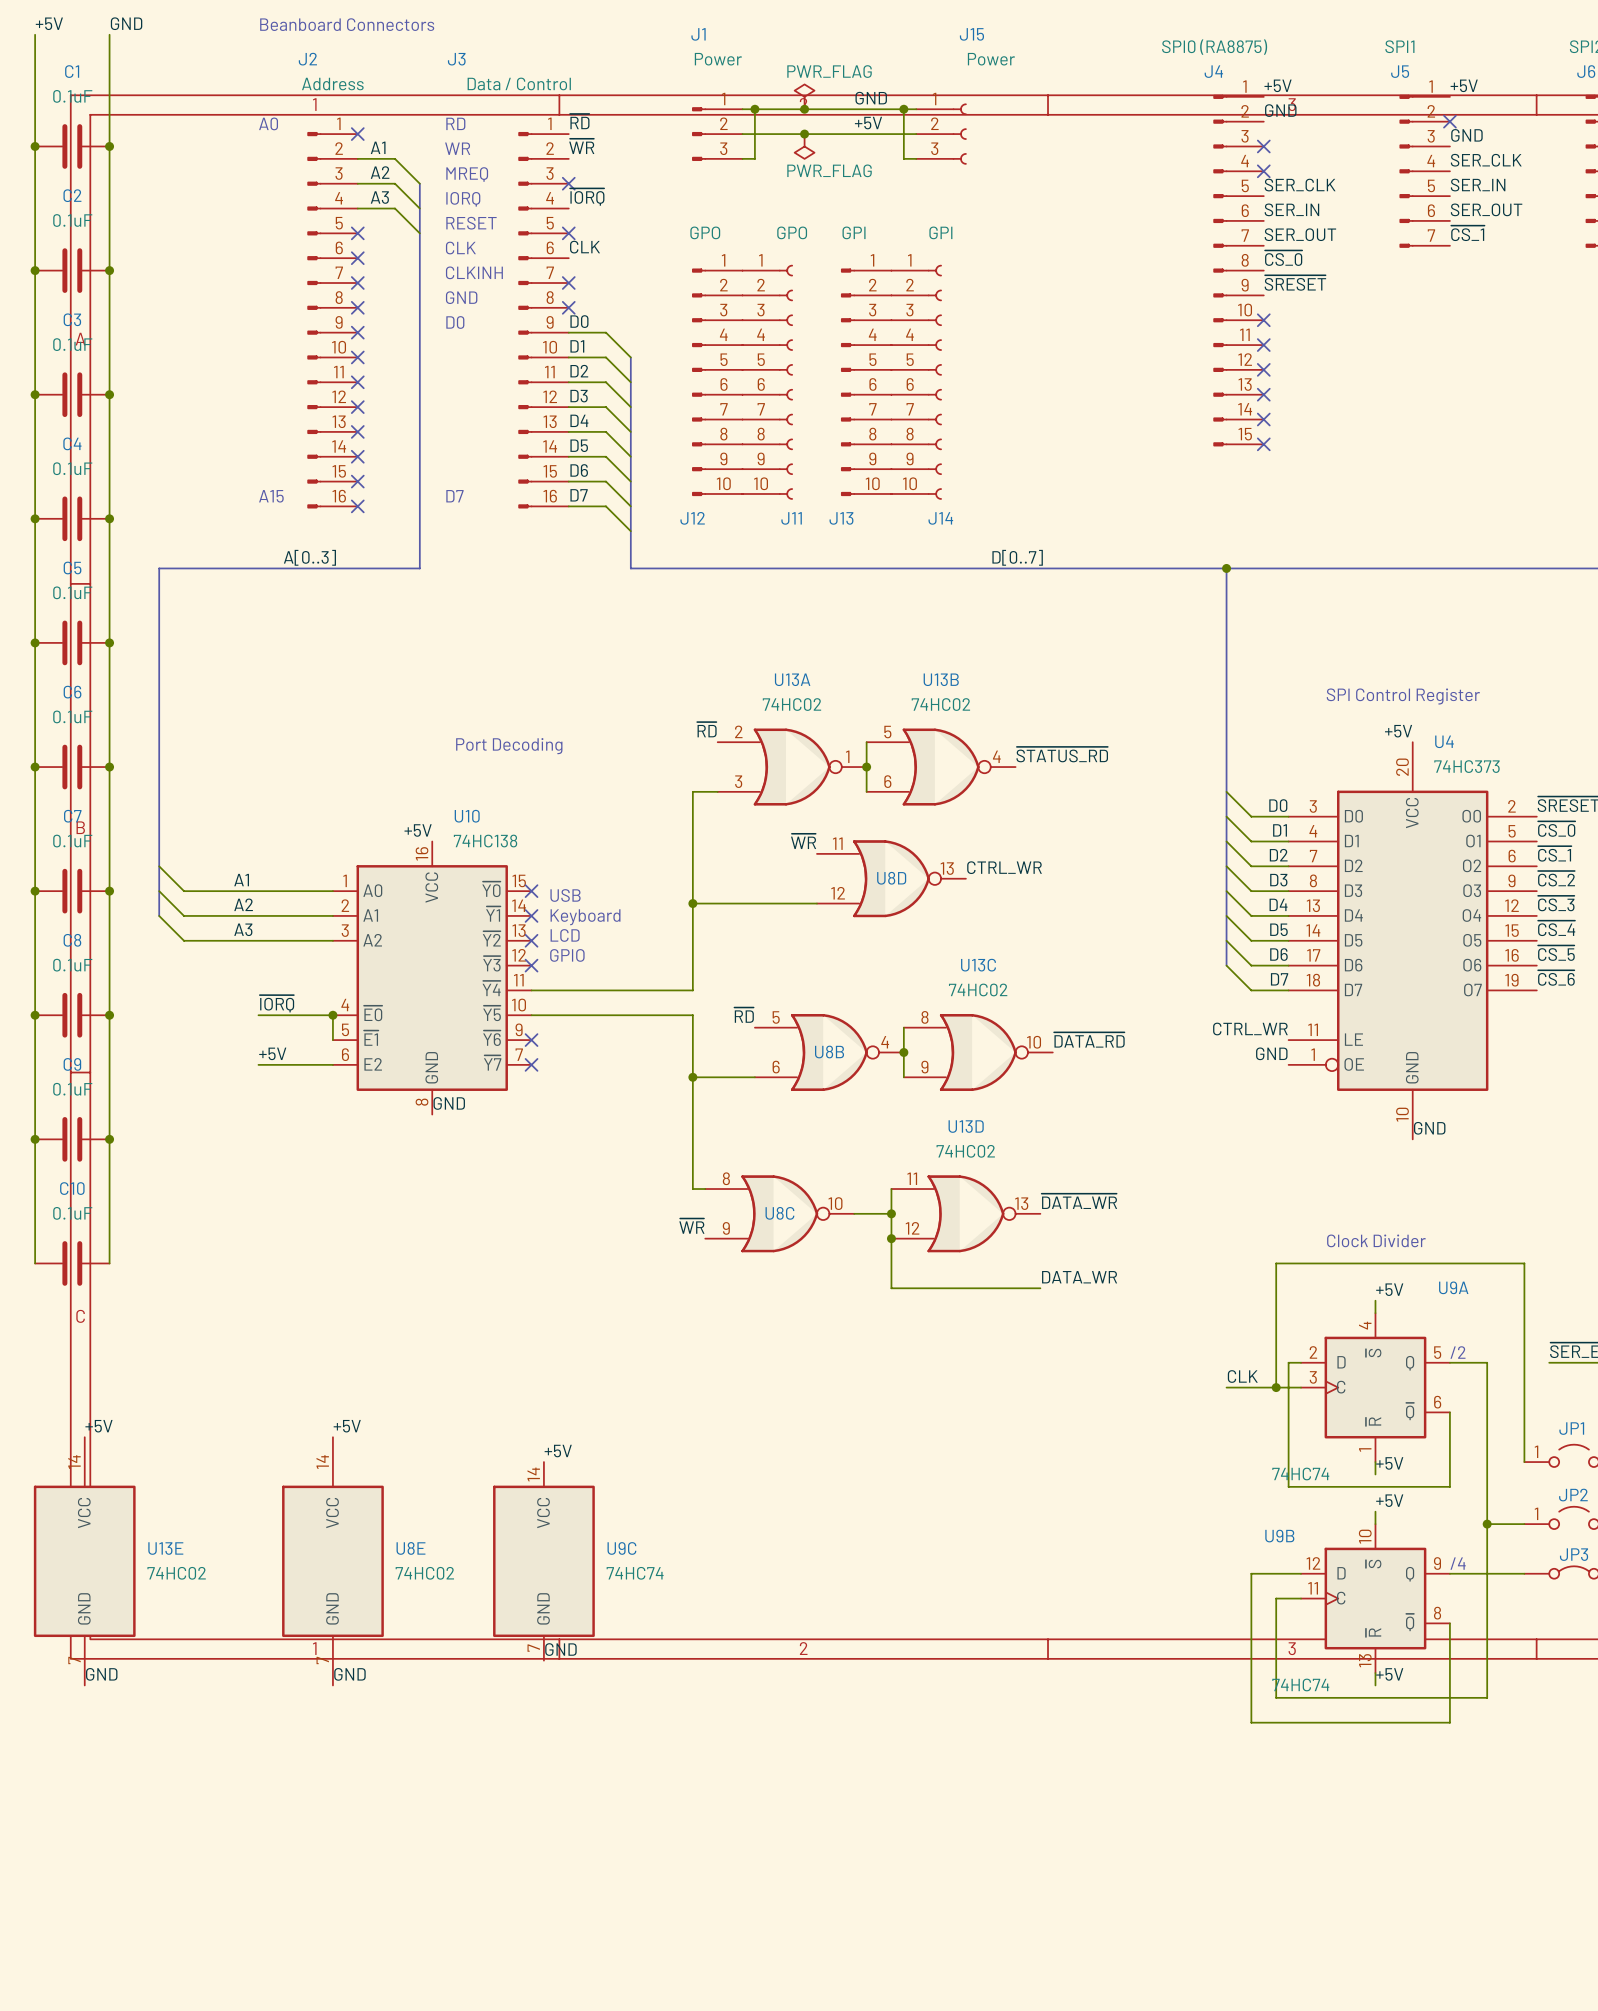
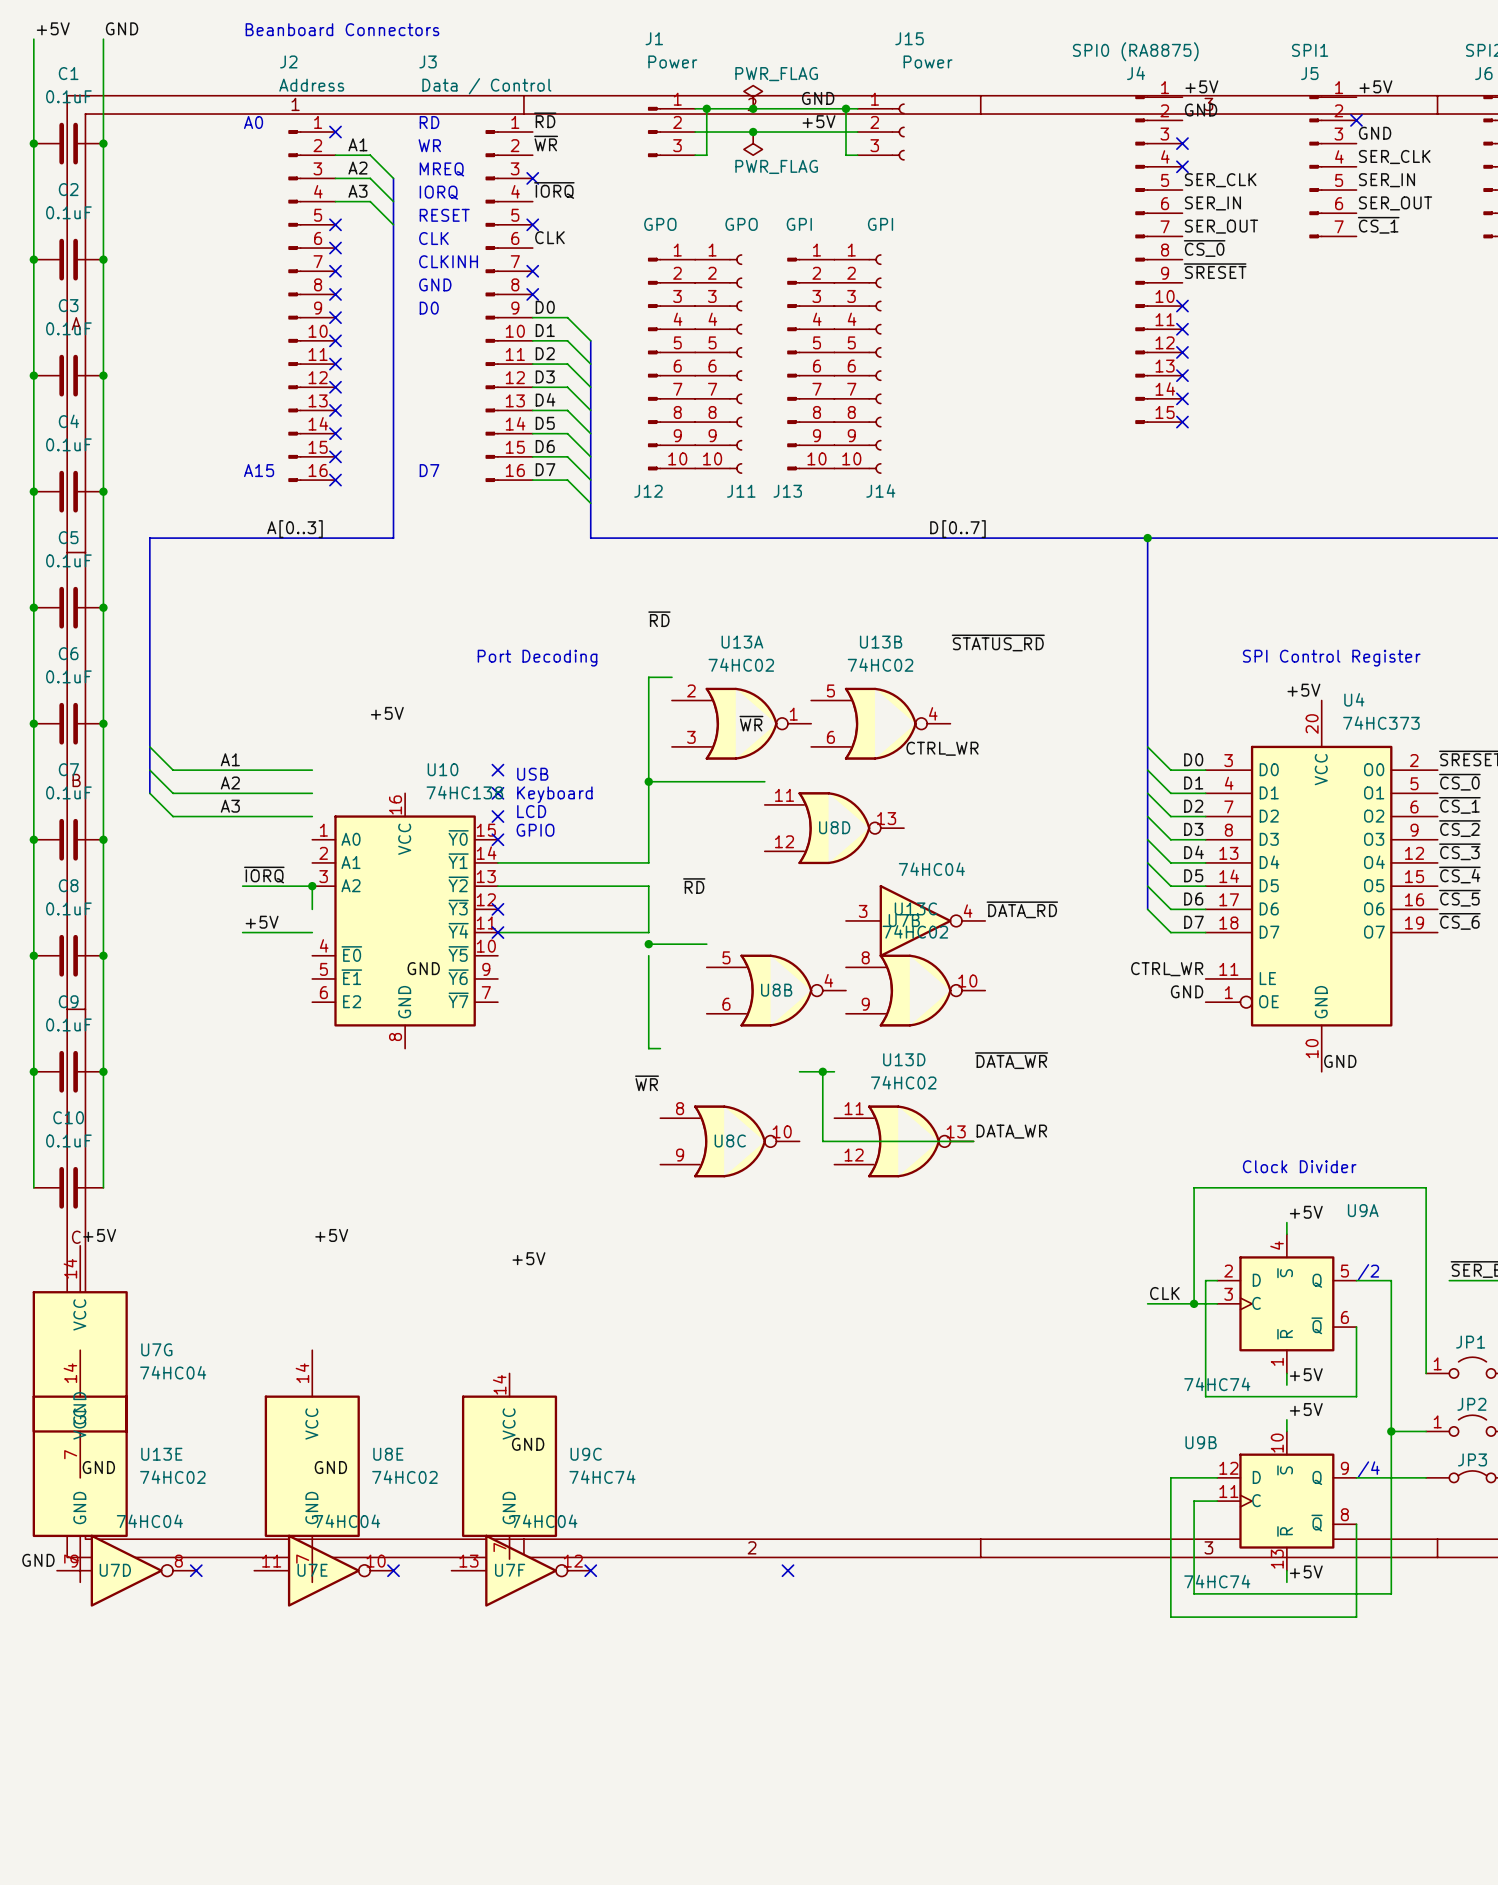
label position: ~{RD} (706, 729) -> ~{RD} (659, 619)
wire: (866, 742) (866, 791) -> none
text position: Port Decoding (509, 746) -> Port Decoding (537, 658)
label position: ~{STATUS_RD} (1062, 754) -> ~{STATUS_RD} (998, 642)
junction: (866, 767) -> none
wire: (692, 791) (717, 791) -> (648, 746) (648, 677) (671, 677)
no-connect mark: none -> (497, 770)
junction: none -> (648, 781)
label position: +5V (418, 830) -> +5V (387, 713)
wire: none -> (149, 793) (173, 816) (312, 816)
bus: (159, 841) (159, 915) -> none
no-connect mark: none -> (497, 793)
label position: ~{WR} (803, 841) -> ~{WR} (751, 723)
wire: (159, 866) (184, 891) (332, 891) -> (149, 746) (173, 770) (312, 770)
no-connect mark: none -> (497, 816)
label position: CTRL_WR (1004, 867) -> CTRL_WR (942, 748)
label position: A1 (241, 880) -> A1 (230, 759)
wire: (159, 891) (184, 915) (332, 915) -> (149, 770) (173, 793) (312, 793)
text position: USB (565, 895) -> USB (532, 774)
wire: (692, 903) (816, 903) -> (648, 781) (764, 781)
junction: (692, 903) -> none
label position: A2 (243, 904) -> A2 (230, 782)
wire: (159, 915) (184, 940) (258, 940) -> none
no-connect mark: (531, 915) -> none
wire: (692, 915) (692, 940) -> (648, 862) (497, 862)
text position: Keyboard (585, 917) -> Keyboard (554, 794)
label position: A3 (243, 929) -> A3 (230, 806)
text position: LCD (565, 935) -> LCD (531, 811)
wire: none -> (312, 886) (312, 909)
junction: none -> (312, 886)
no-connect mark: (531, 940) -> none
text position: GPIO (567, 955) -> GPIO (535, 830)
U7B: none -> 74HC04 (915, 920)
no-connect mark: none -> (497, 932)
junction: none -> (648, 944)
label position: ~{IORQ} (276, 1003) -> ~{IORQ} (264, 875)
wire: (258, 1015) (332, 1015) (332, 1040) -> none
junction: (332, 1015) -> none
wire: (531, 1015) (692, 1015) -> (497, 886) (648, 886)
label position: ~{RD} (744, 1015) -> ~{RD} (694, 886)
wire: (903, 1027) (903, 1077) -> none
label position: ~{DATA_RD} (1089, 1039) -> ~{DATA_RD} (1022, 909)
no-connect mark: (531, 1040) -> none
junction: (903, 1052) -> none
label position: +5V (272, 1053) -> +5V (262, 922)
wire: (258, 1064) (332, 1064) -> (242, 932) (312, 932)
no-connect mark: (531, 1064) -> none
wire: (692, 1077) (754, 1077) -> (648, 944) (706, 944)
junction: (692, 1077) -> none
label position: GND (449, 1103) -> GND (423, 968)
wire: (692, 1114) (692, 1189) (705, 1189) -> (648, 1048) (660, 1048)
label: none -> ~{DATA_WR} (1011, 1060)
wire: none -> (799, 1071) (834, 1071)
junction: none -> (822, 1071)
wire: (891, 1189) (891, 1288) (1040, 1288) -> none
label: ~{DATA_WR} (1079, 1201) -> DATA_WR (1011, 1131)
wire: (854, 1213) (879, 1213) -> (822, 1071) (822, 1141)
wire: none -> (834, 1141) (973, 1141)
junction: (891, 1213) -> none
label position: ~{WR} (691, 1226) -> ~{WR} (647, 1083)
junction: (891, 1238) -> none
label: DATA_WR (1079, 1277) -> none
label position: +5V (99, 1426) -> +5V (99, 1235)
label position: +5V (347, 1426) -> +5V (331, 1235)
U7G: none -> 74HC04 (80, 1361)
label position: +5V (558, 1451) -> +5V (528, 1258)
label: none -> GND (98, 1467)
label position: GND (560, 1649) -> GND (528, 1444)
U7D: none -> 74HC04 (126, 1570)
no-connect mark: none -> (196, 1570)
U7E: none -> 74HC04 (323, 1570)
no-connect mark: none -> (393, 1570)
U7F: none -> 74HC04 (521, 1570)
no-connect mark: none -> (590, 1570)
no-connect mark: none -> (787, 1570)
label position: GND (101, 1674) -> GND (38, 1560)
label position: GND (349, 1674) -> GND (330, 1467)

